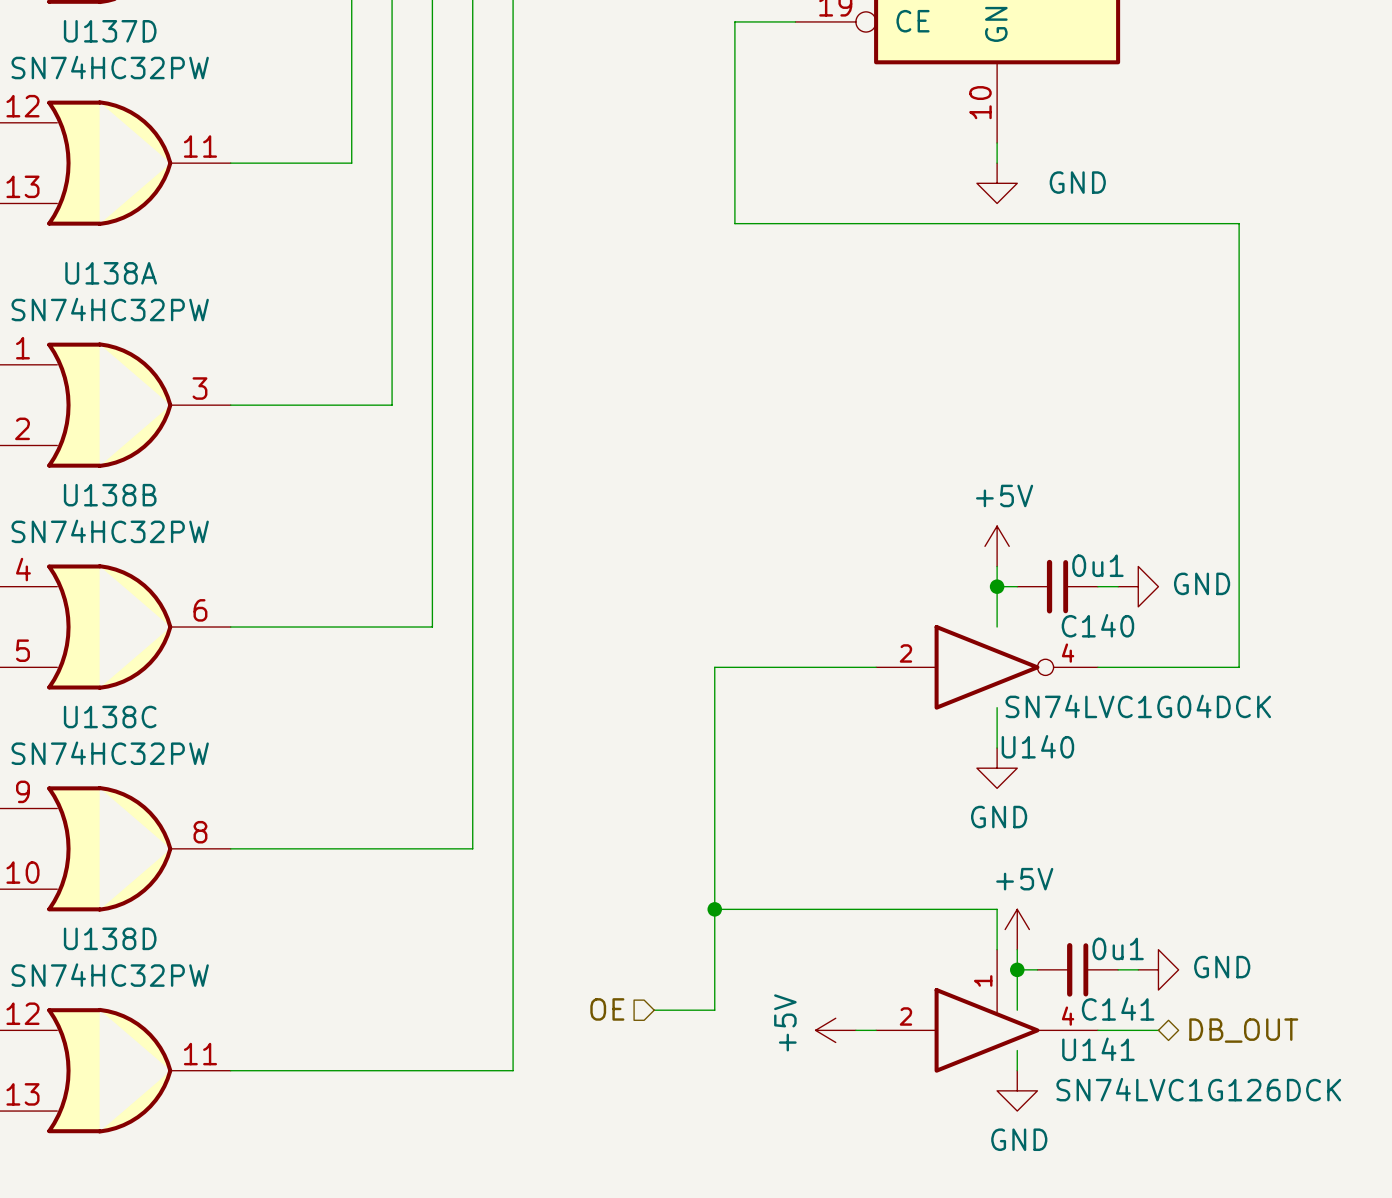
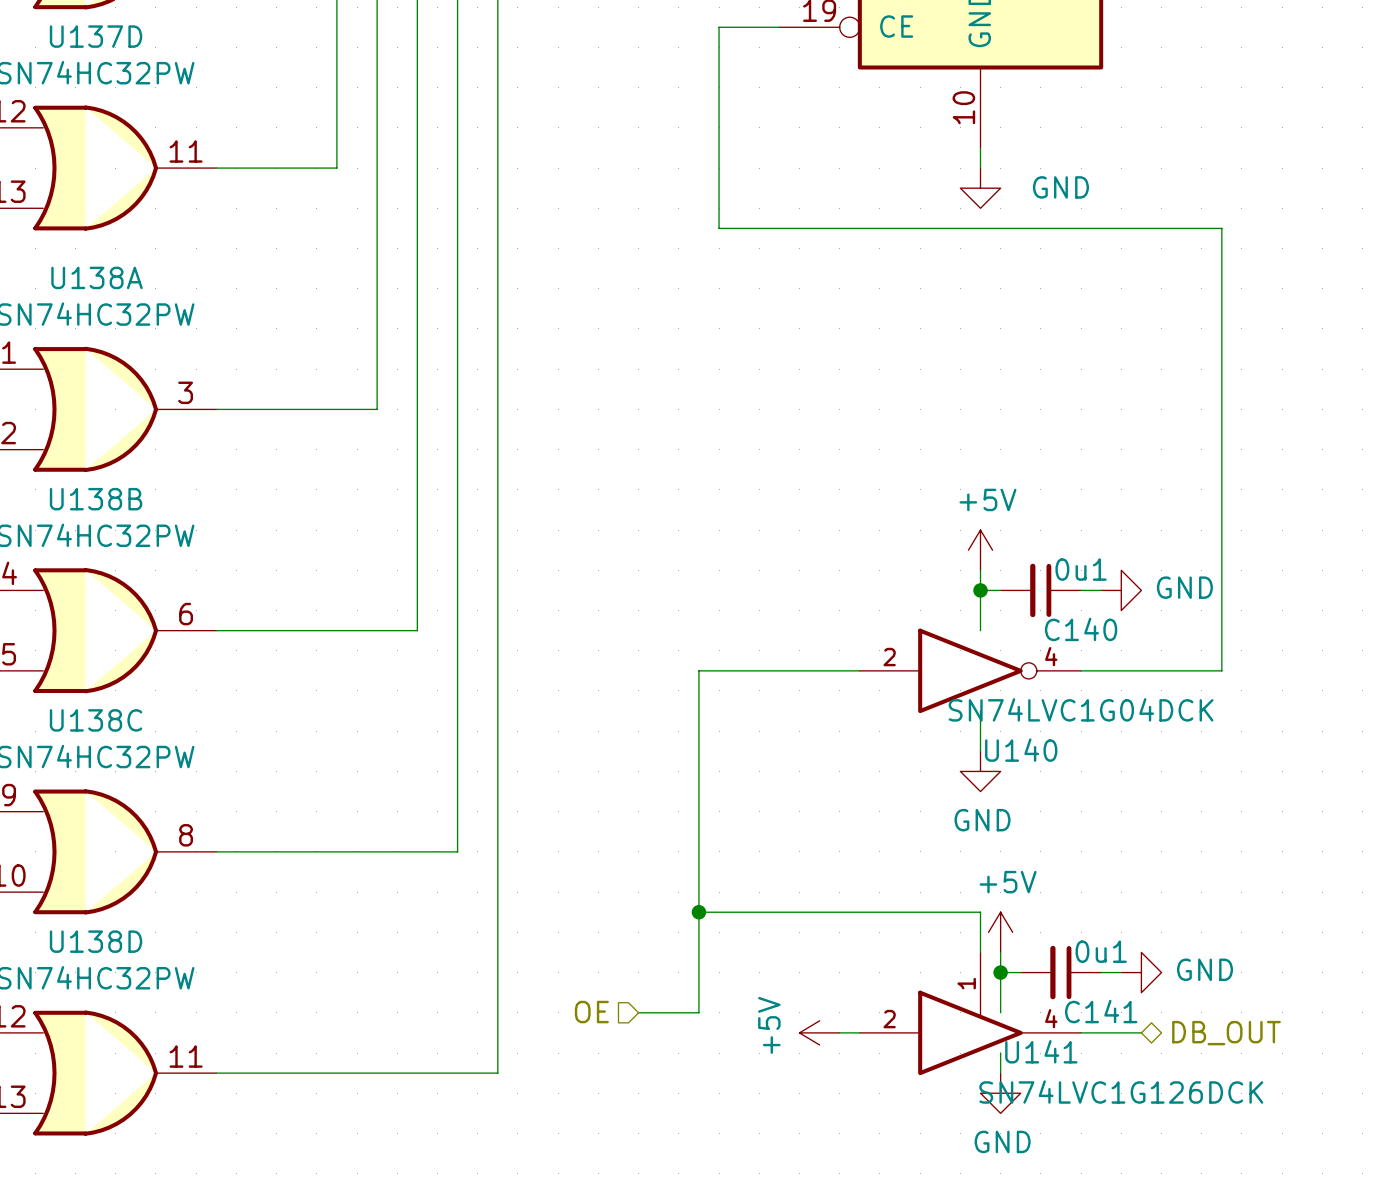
U140 value position: SN74LVC1G04DCK (1138, 706) -> SN74LVC1G04DCK (1081, 709)
U141 name position: U141 (1098, 1049) -> U141 (1041, 1051)
U141 value position: SN74LVC1G126DCK (1198, 1089) -> SN74LVC1G126DCK (1121, 1092)

